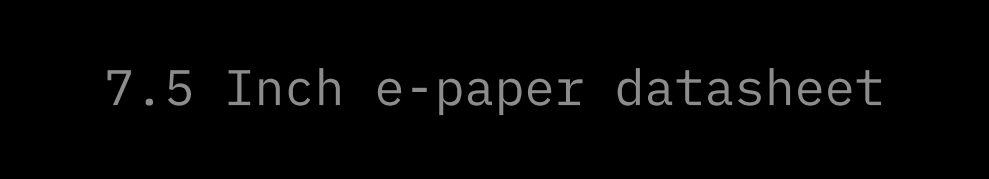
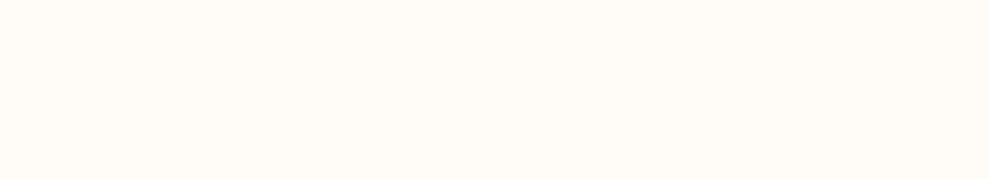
text: 7.5 Inch e-paper datasheet (494, 91) -> none

